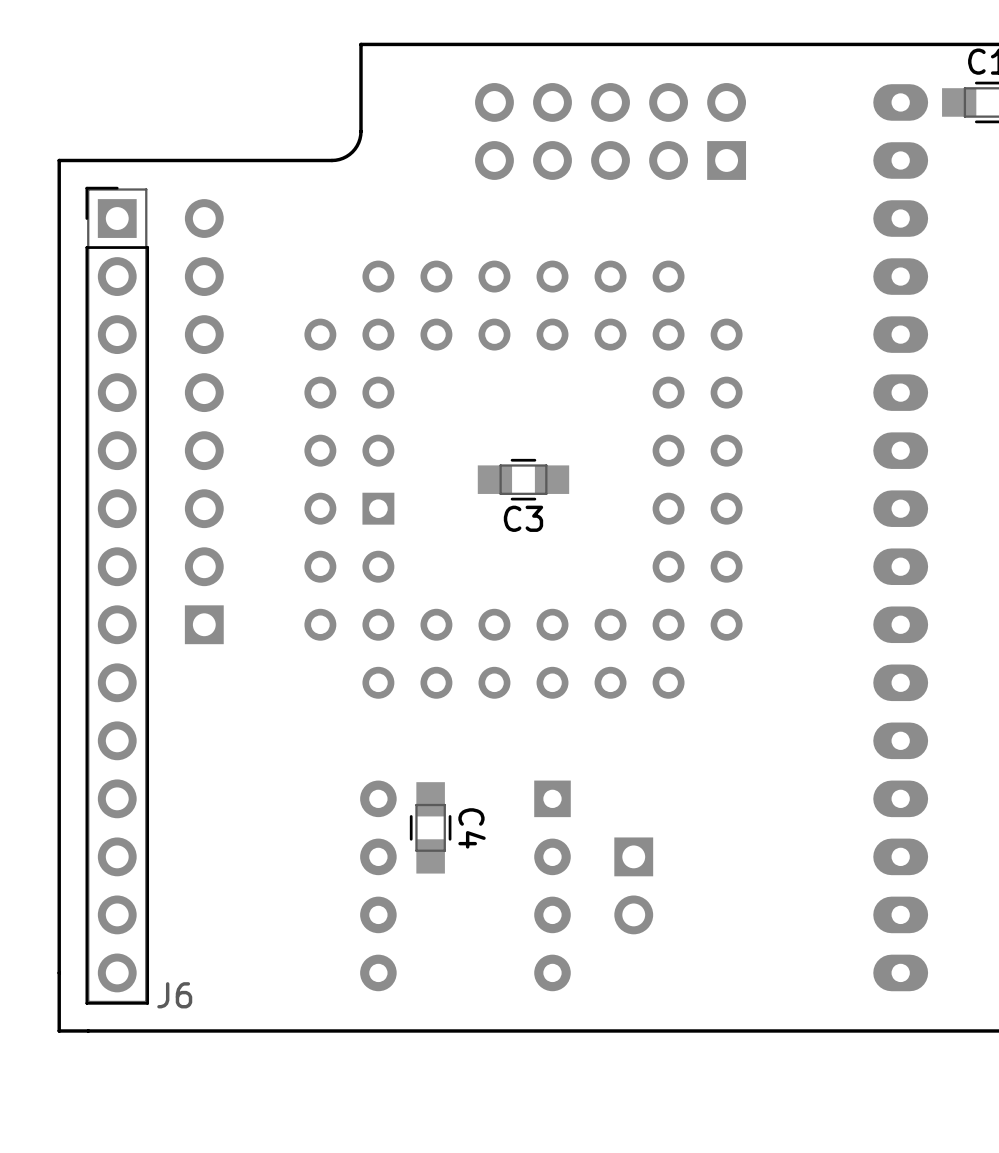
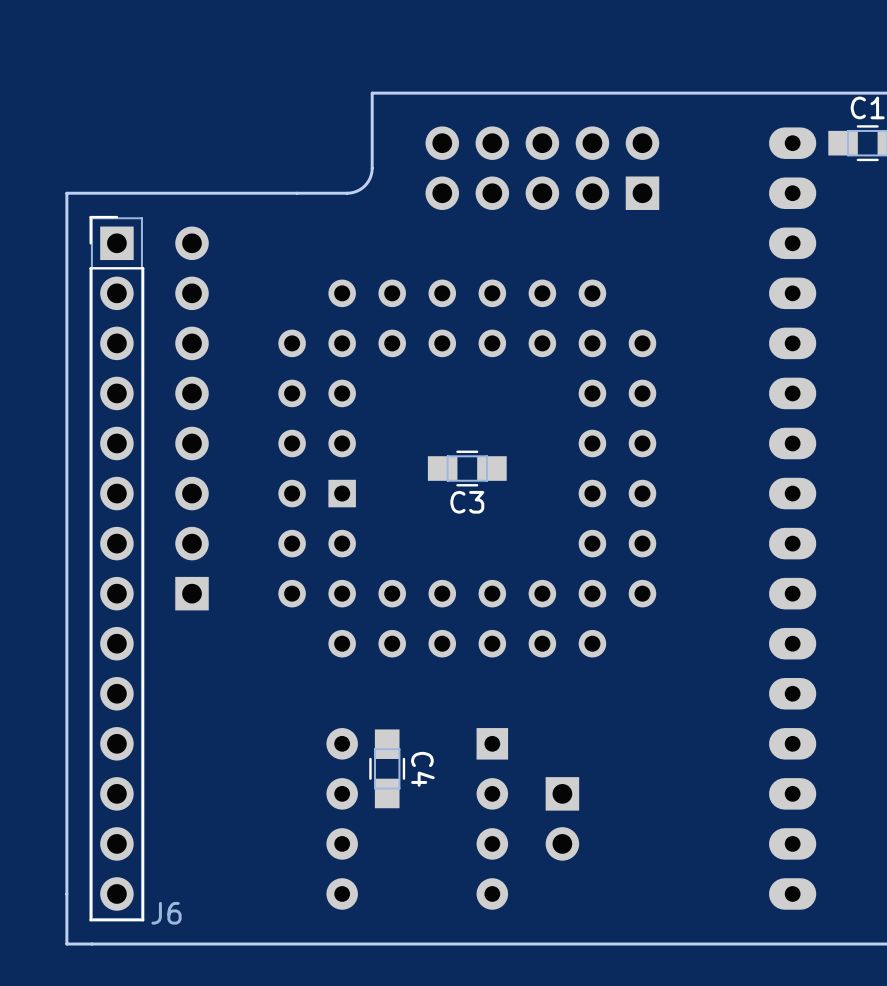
board edge: (413, 44) (360, 44) (360, 138) (349, 154) (331, 160) -> (372, 93) (372, 168) (367, 183) (359, 189) (350, 193) (302, 193)

